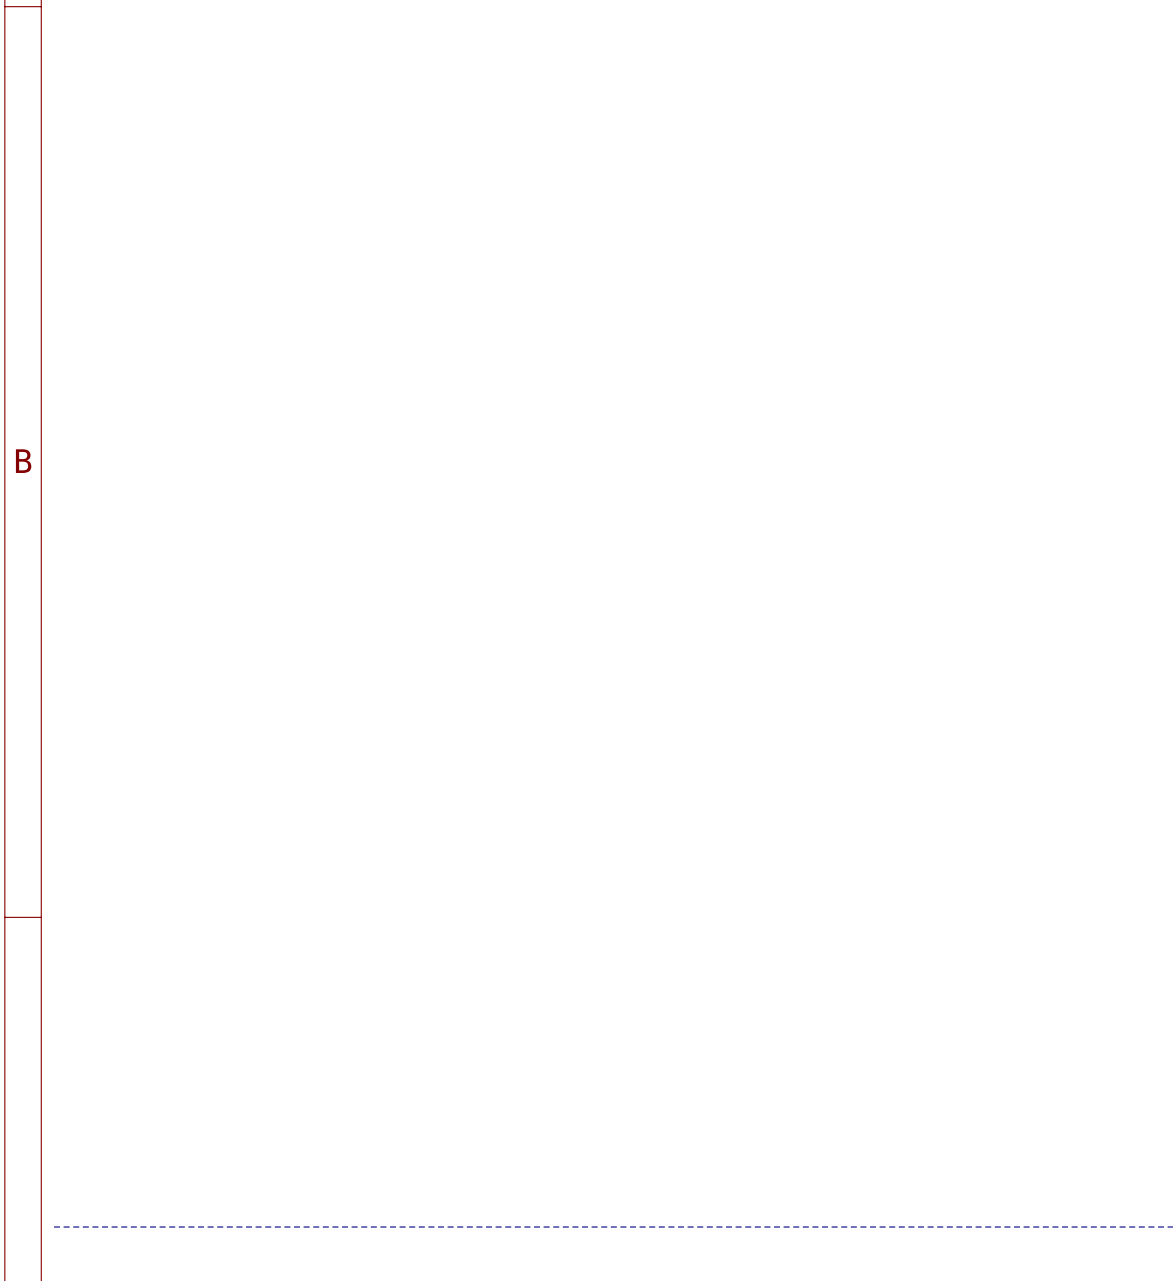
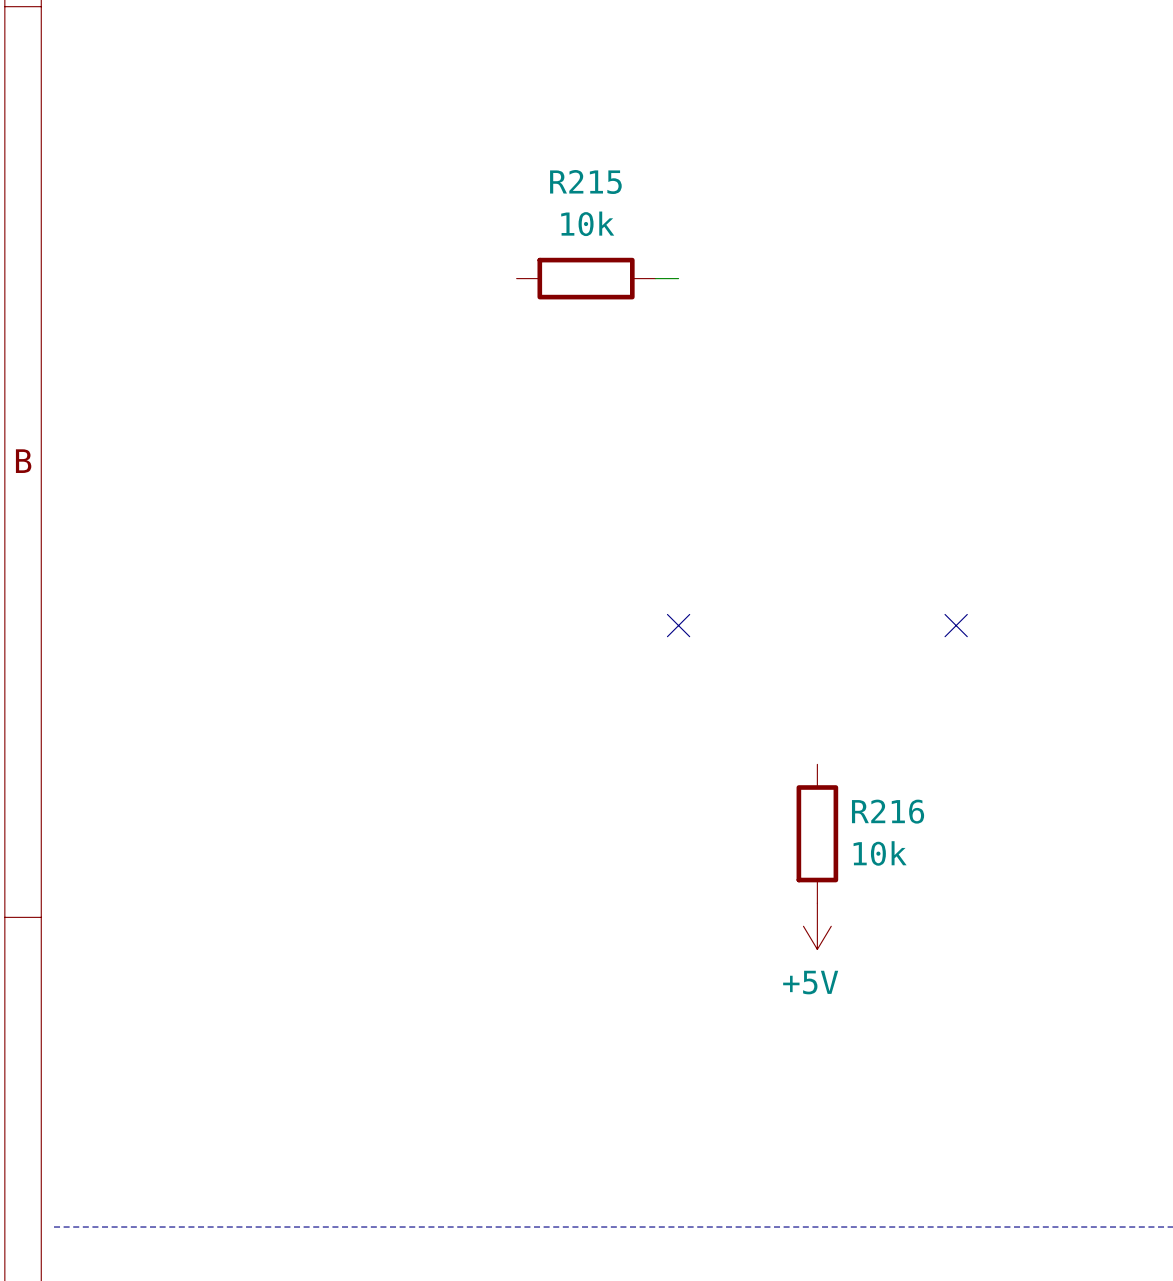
R215: none -> 10k (586, 278)
wire: none -> (655, 278) (678, 278)
no-connect mark: none -> (678, 625)
no-connect mark: none -> (956, 625)
R216: none -> 10k (817, 833)
power symbol: none -> +5V (817, 926)

